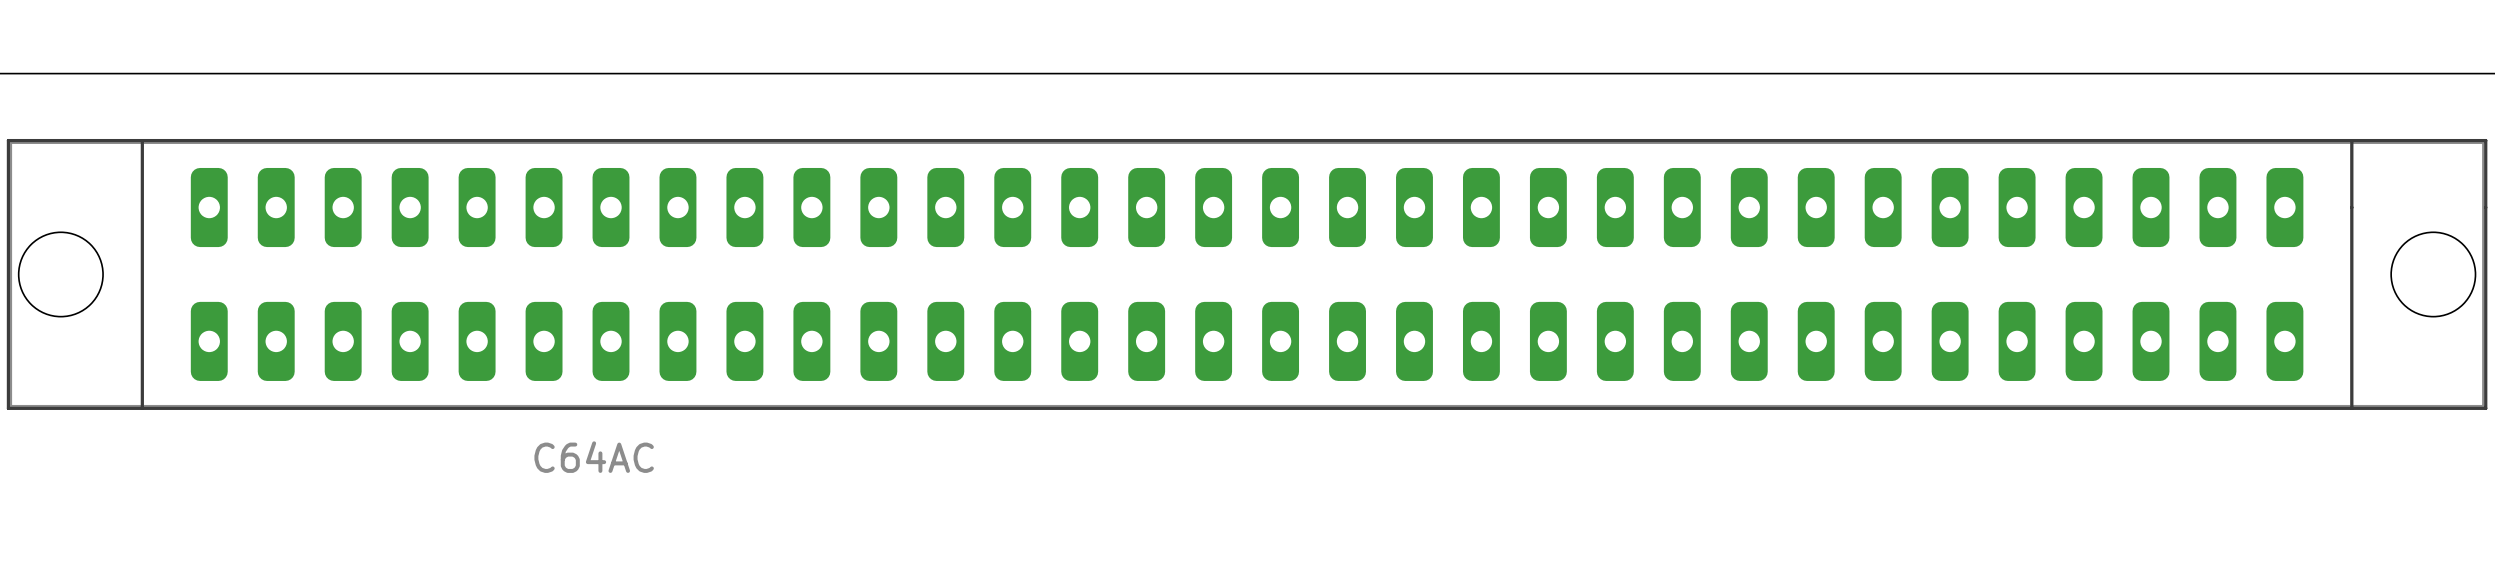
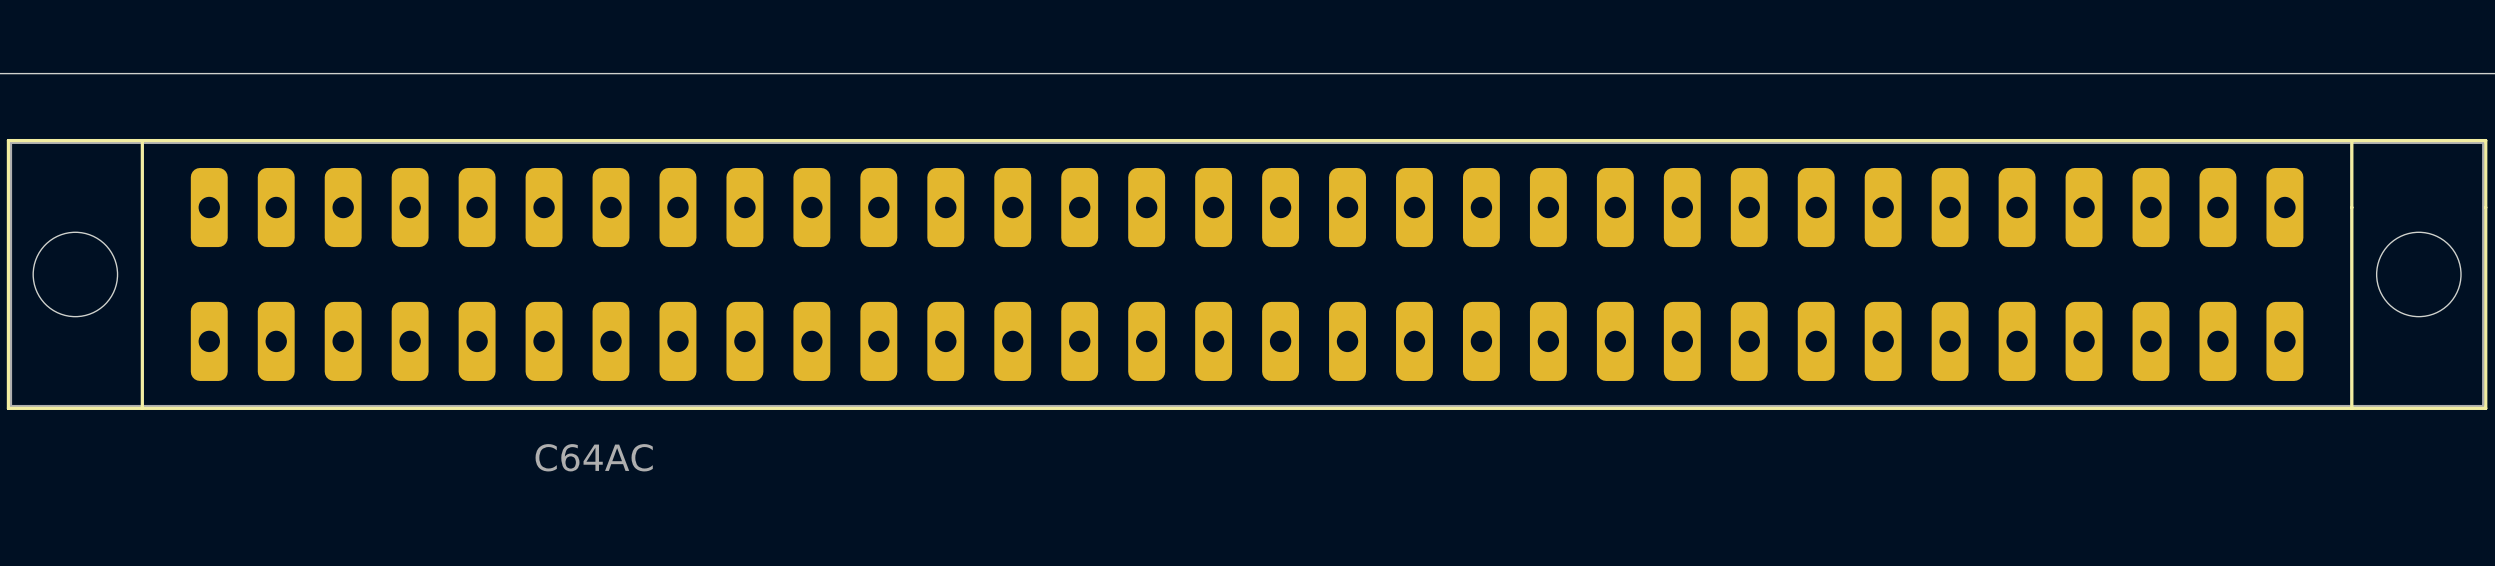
part footprint: [6, 138, 2488, 410] -> [6, 138, 2488, 410]

